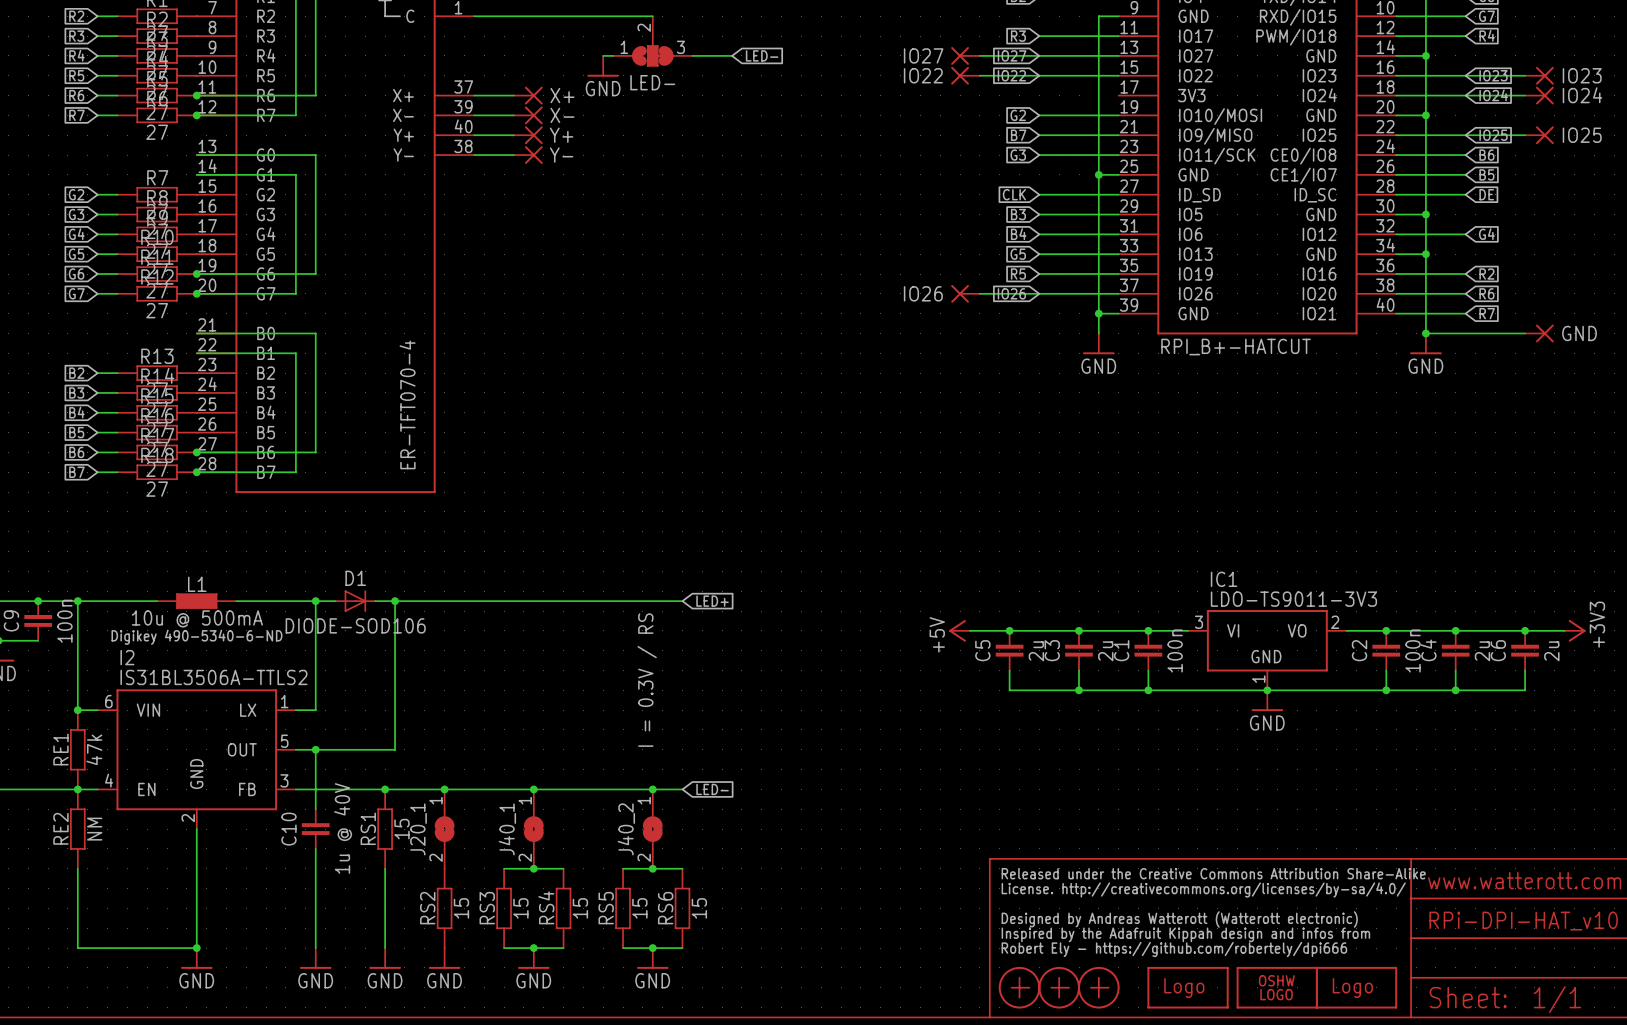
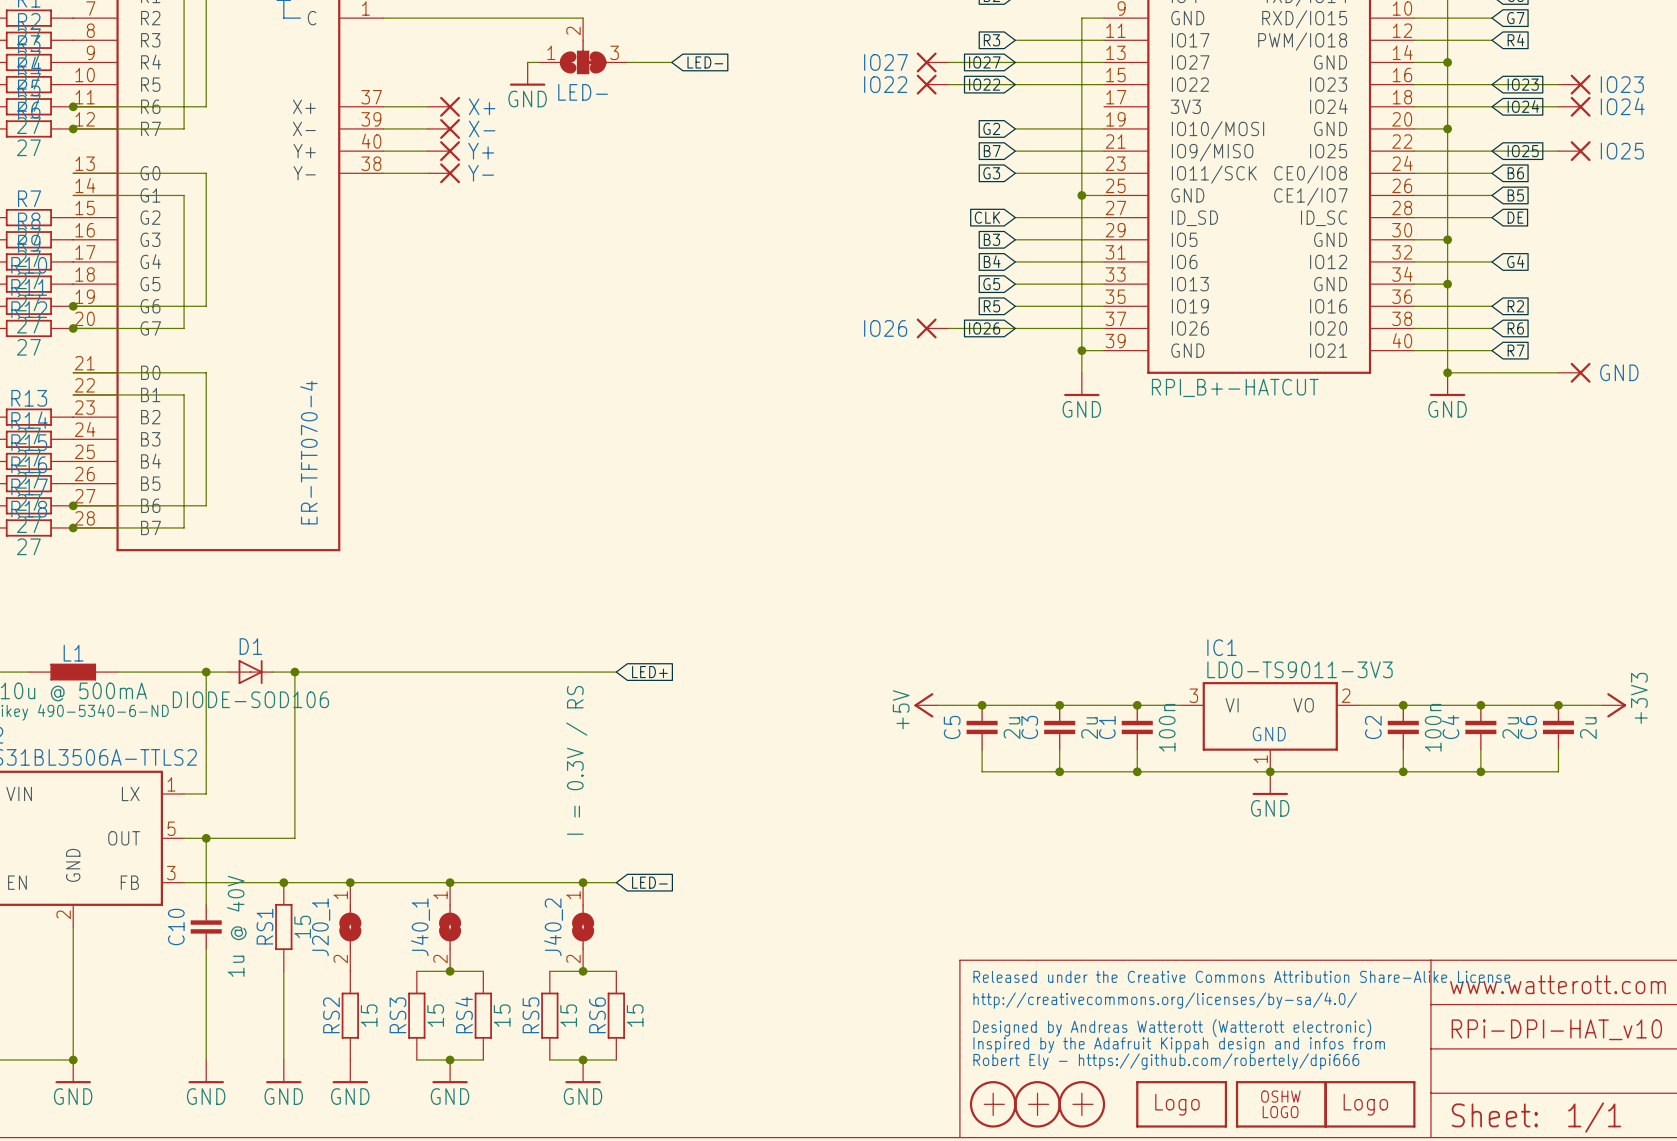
text: License. http://creativecommons.org/licenses/by-sa/4.0/ (1203, 890) -> Released under the Creative Commons Attribution Share-Alike License (1241, 976)
text: none -> http://creativecommons.org/licenses/by-sa/4.0/ (1165, 1000)

